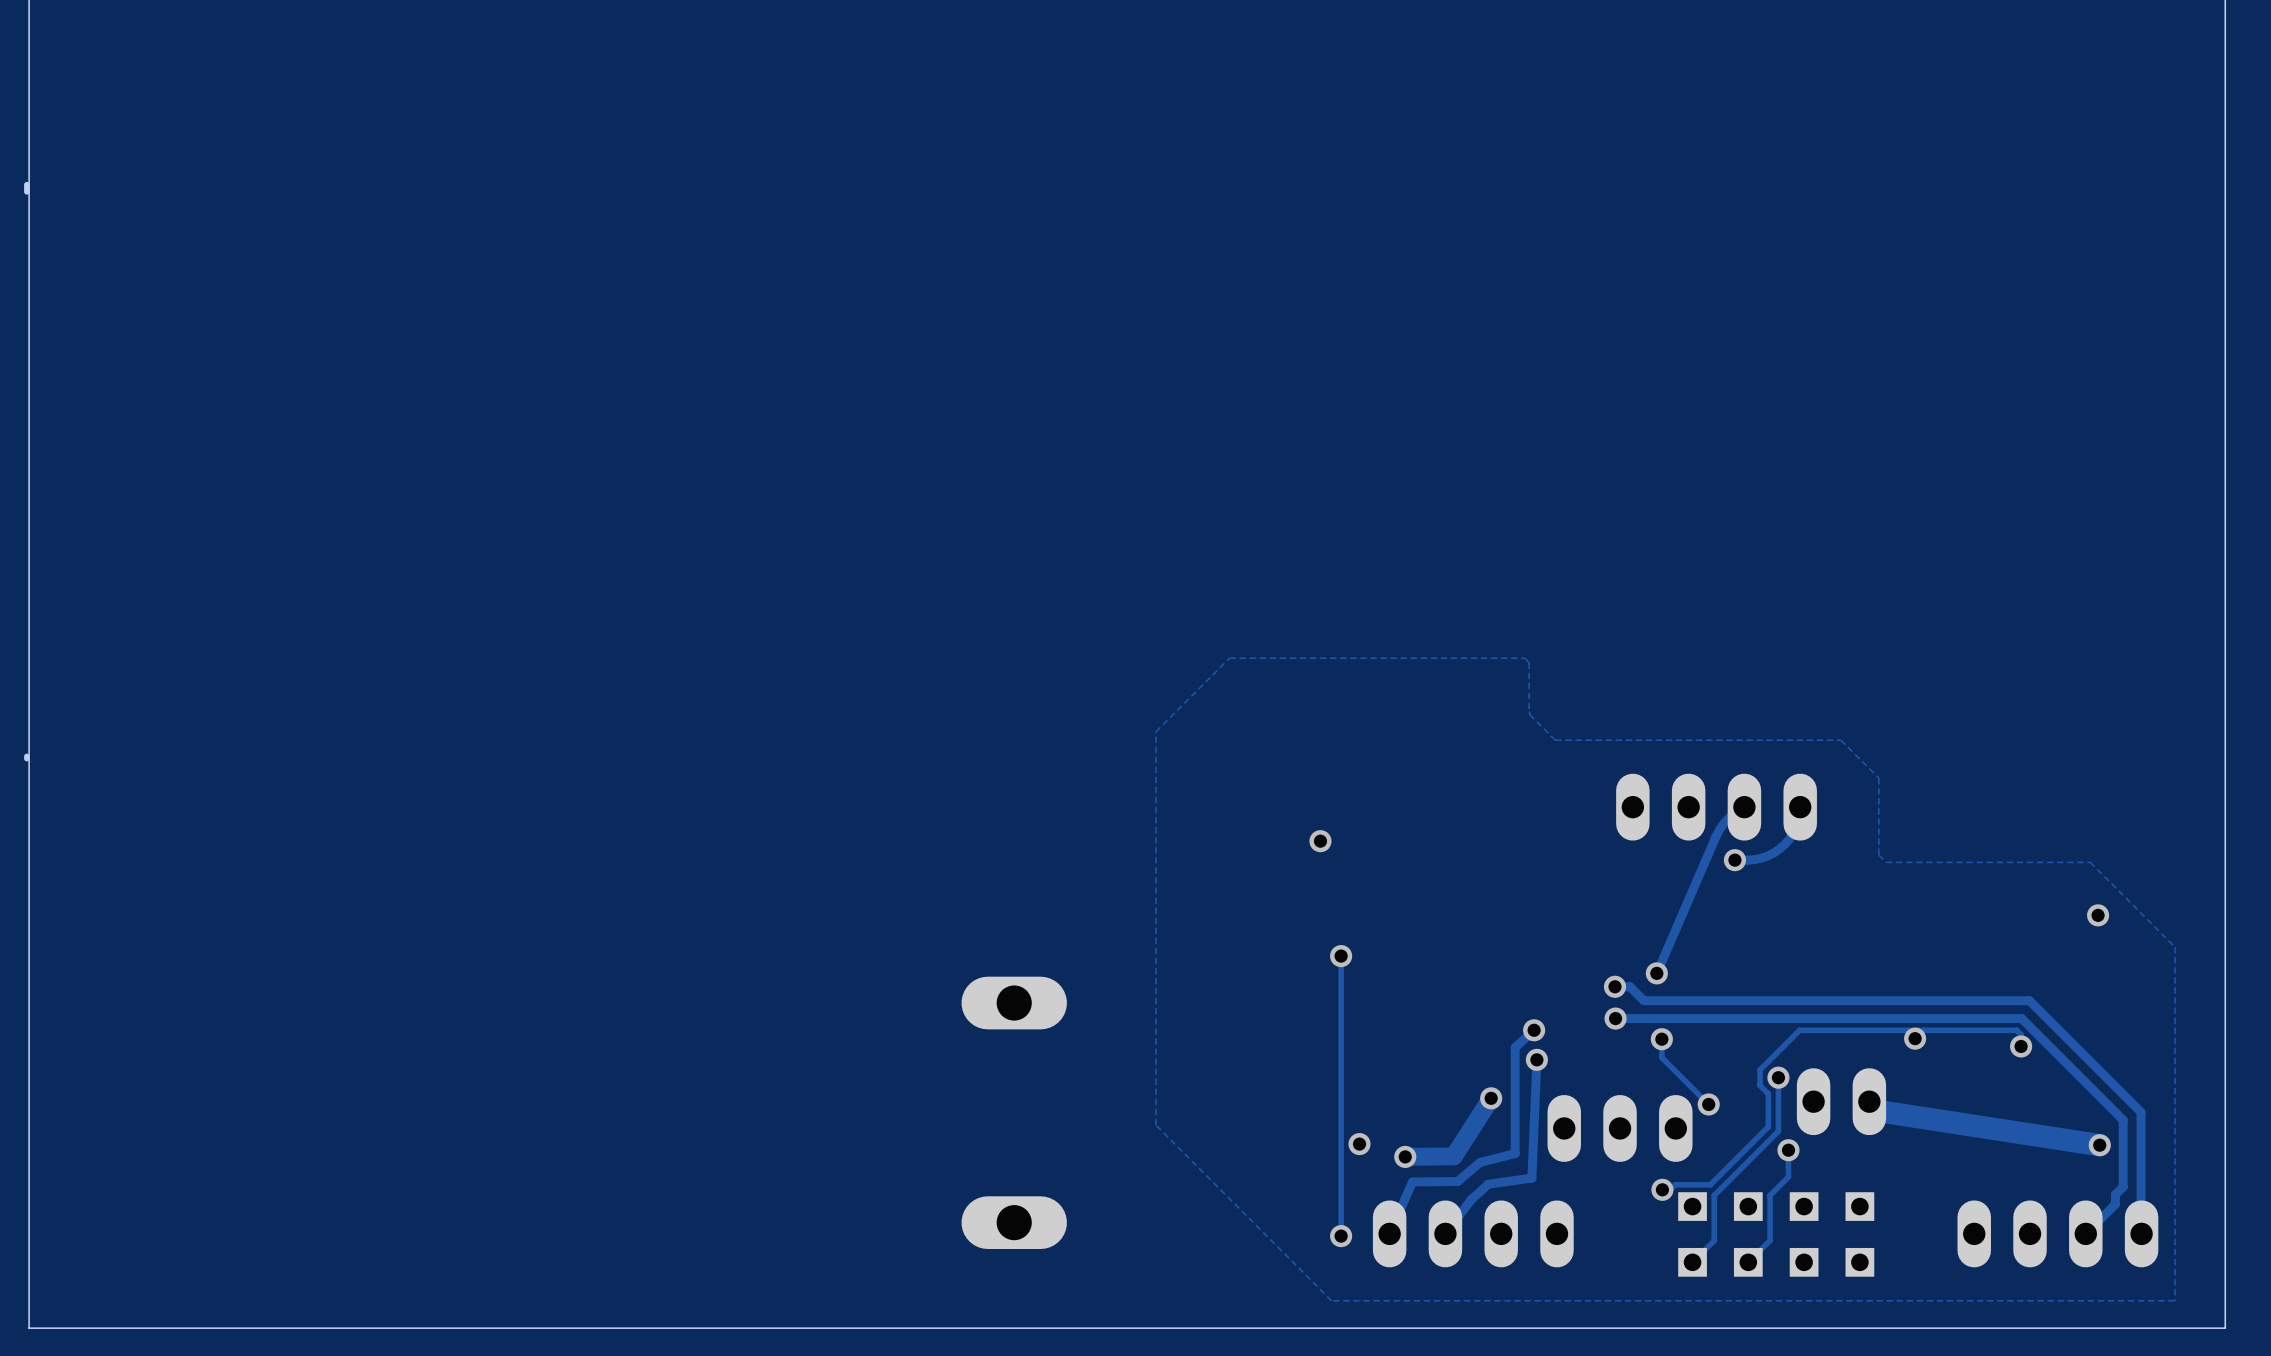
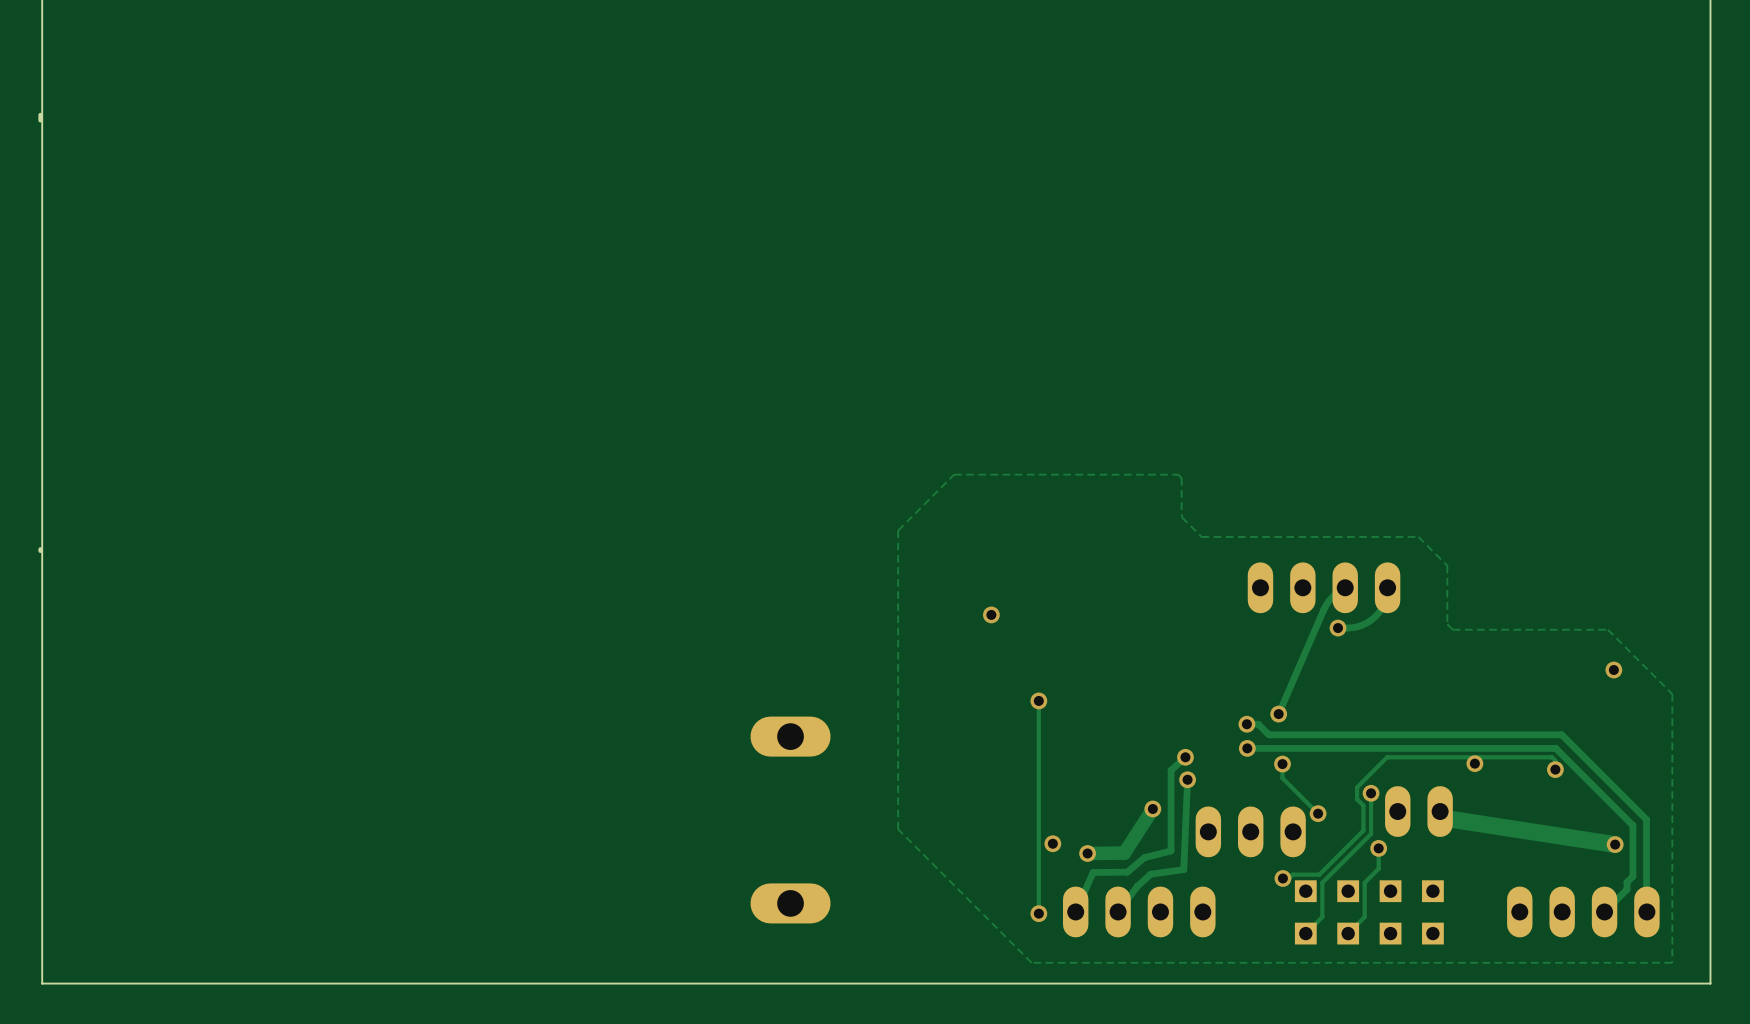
via position: (1320, 841) -> (991, 614)

